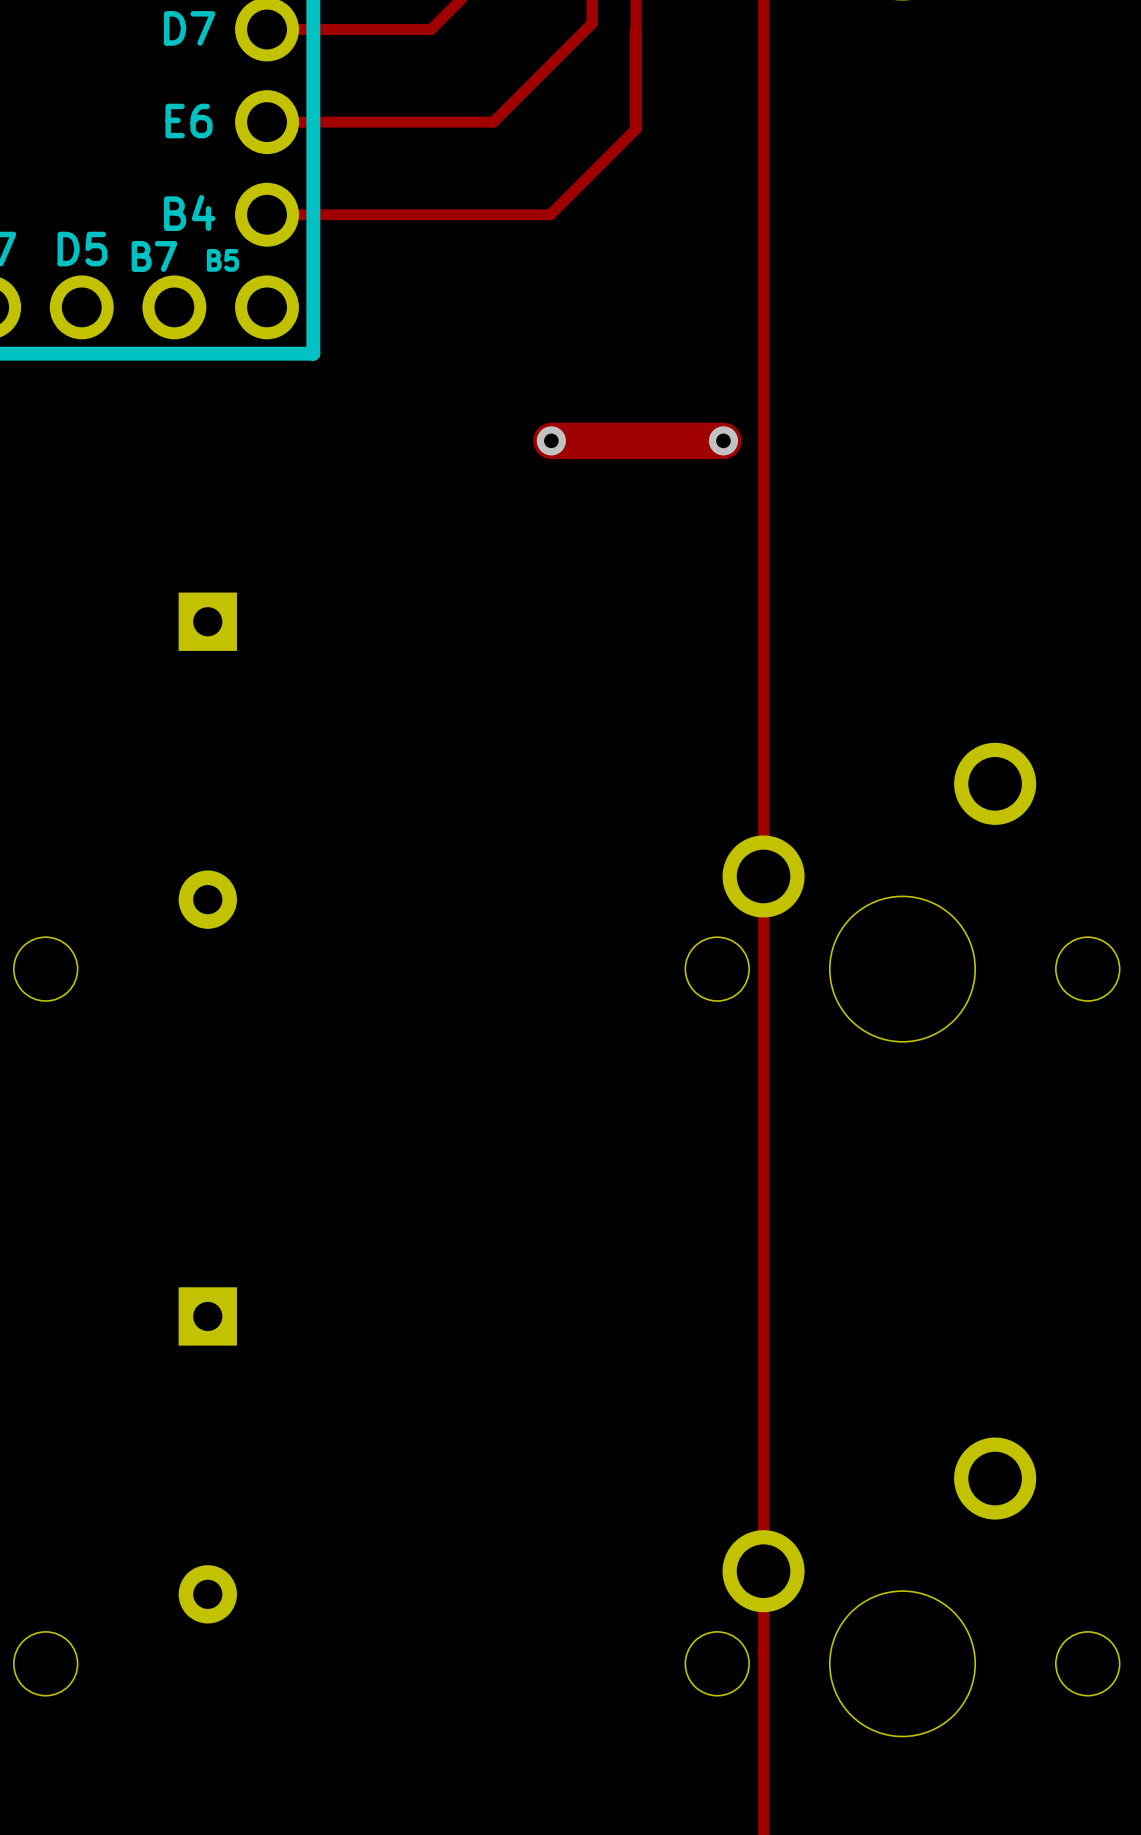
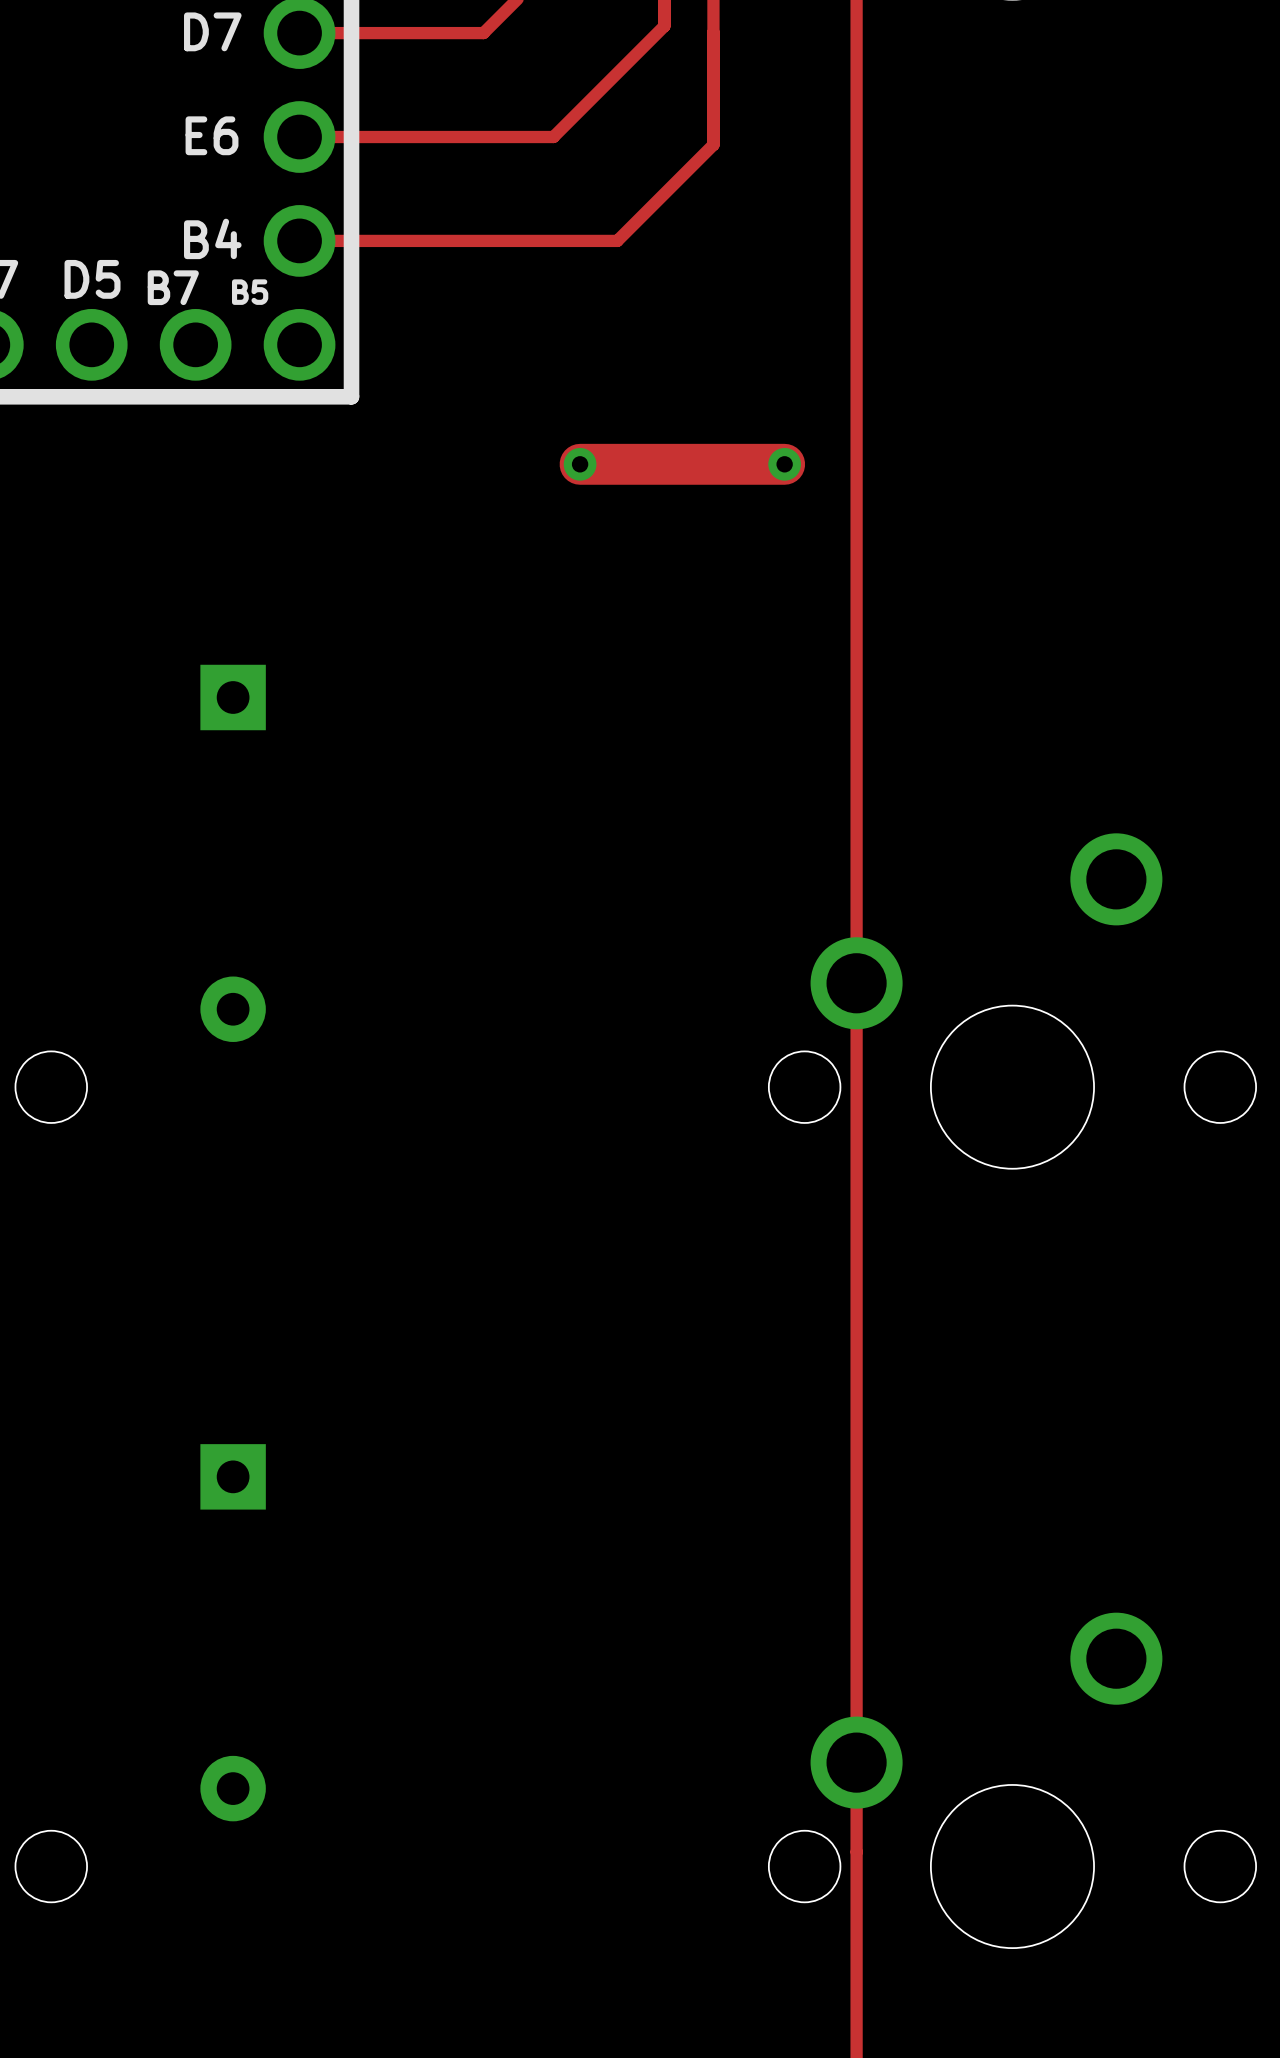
track: none -> (580, 464) (784, 464)
track: (551, 440) (723, 440) -> none
via position: (551, 440) -> (580, 464)
via position: (723, 440) -> (784, 464)

